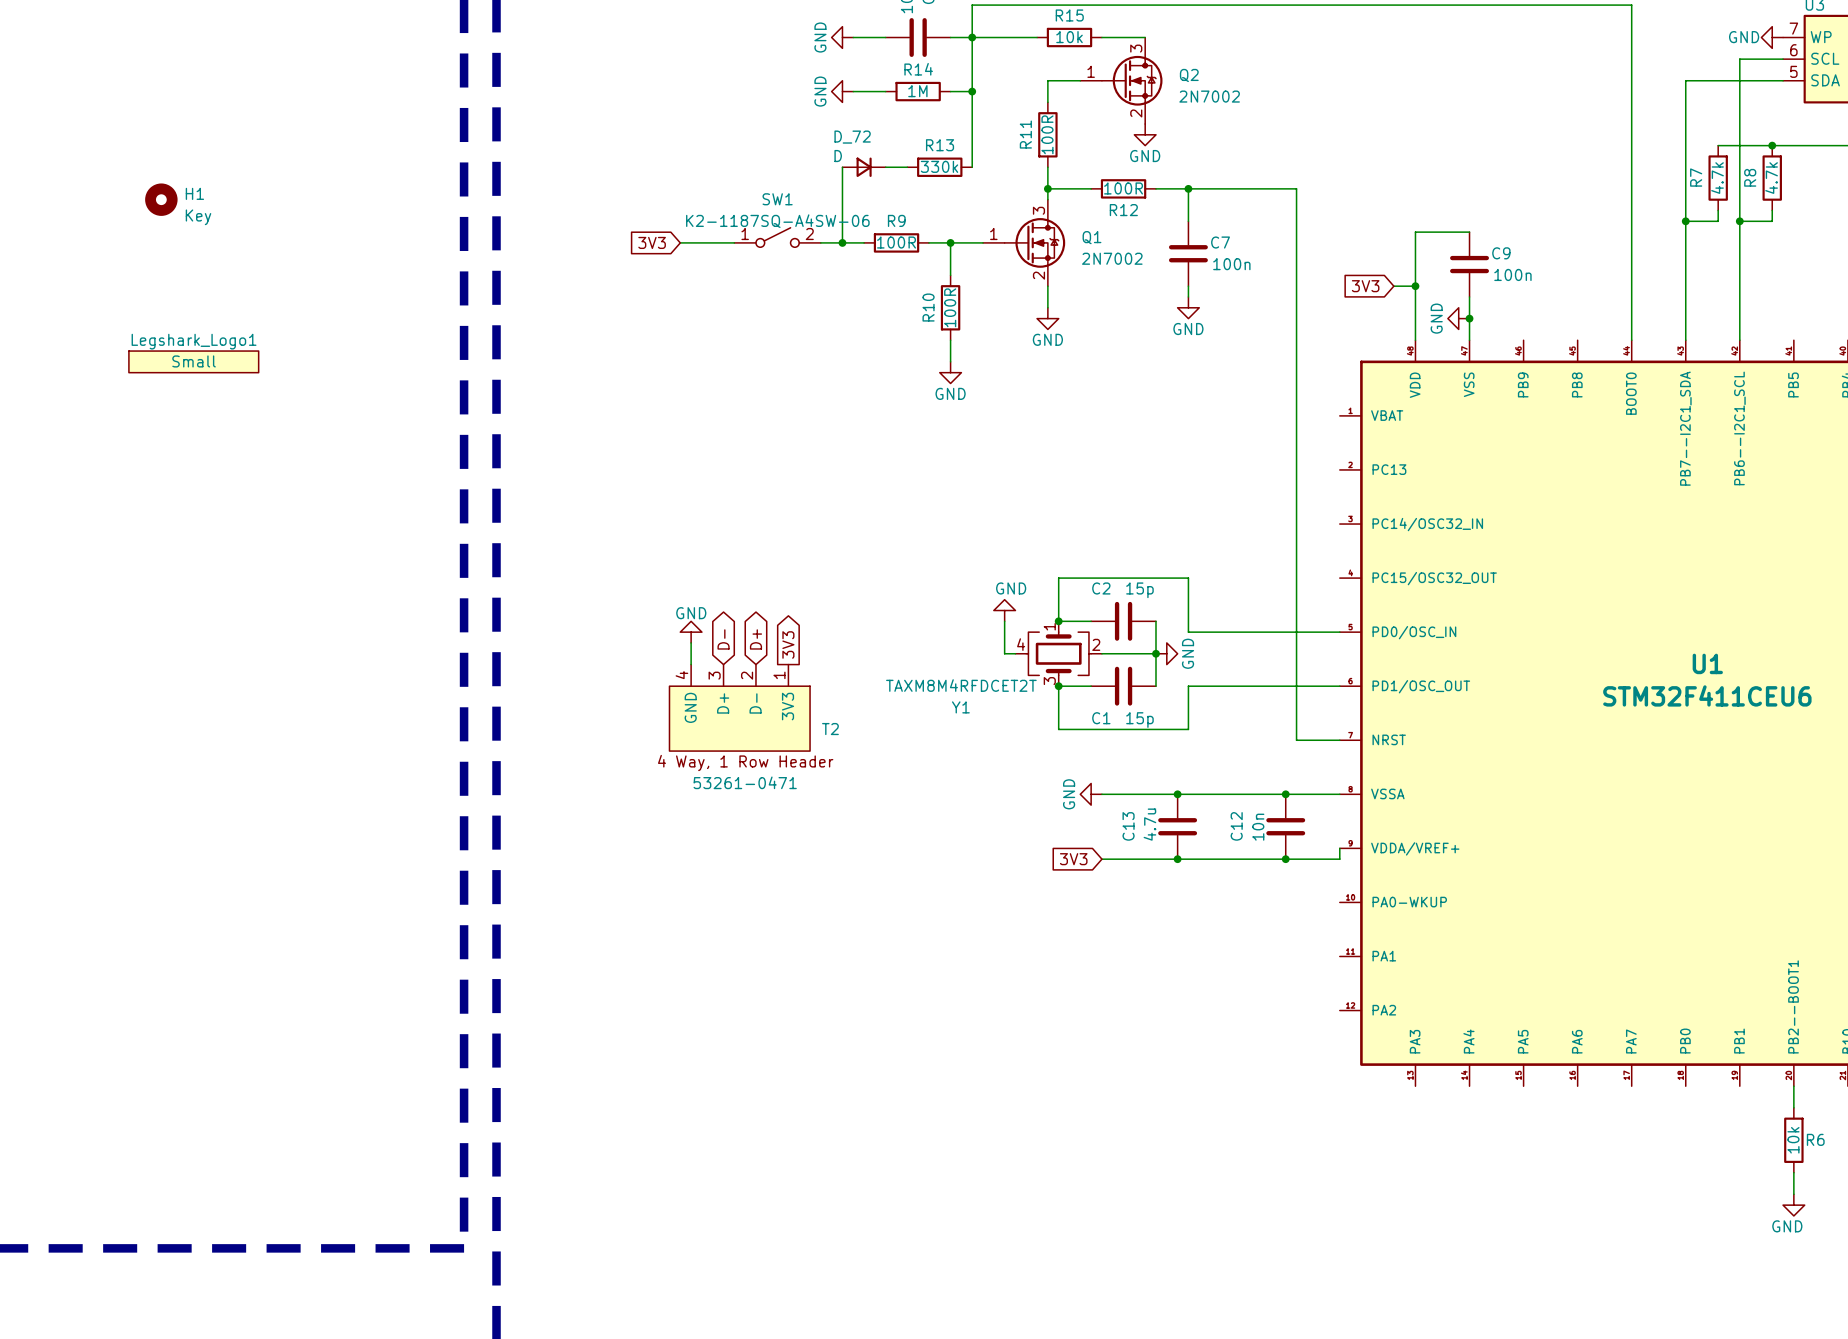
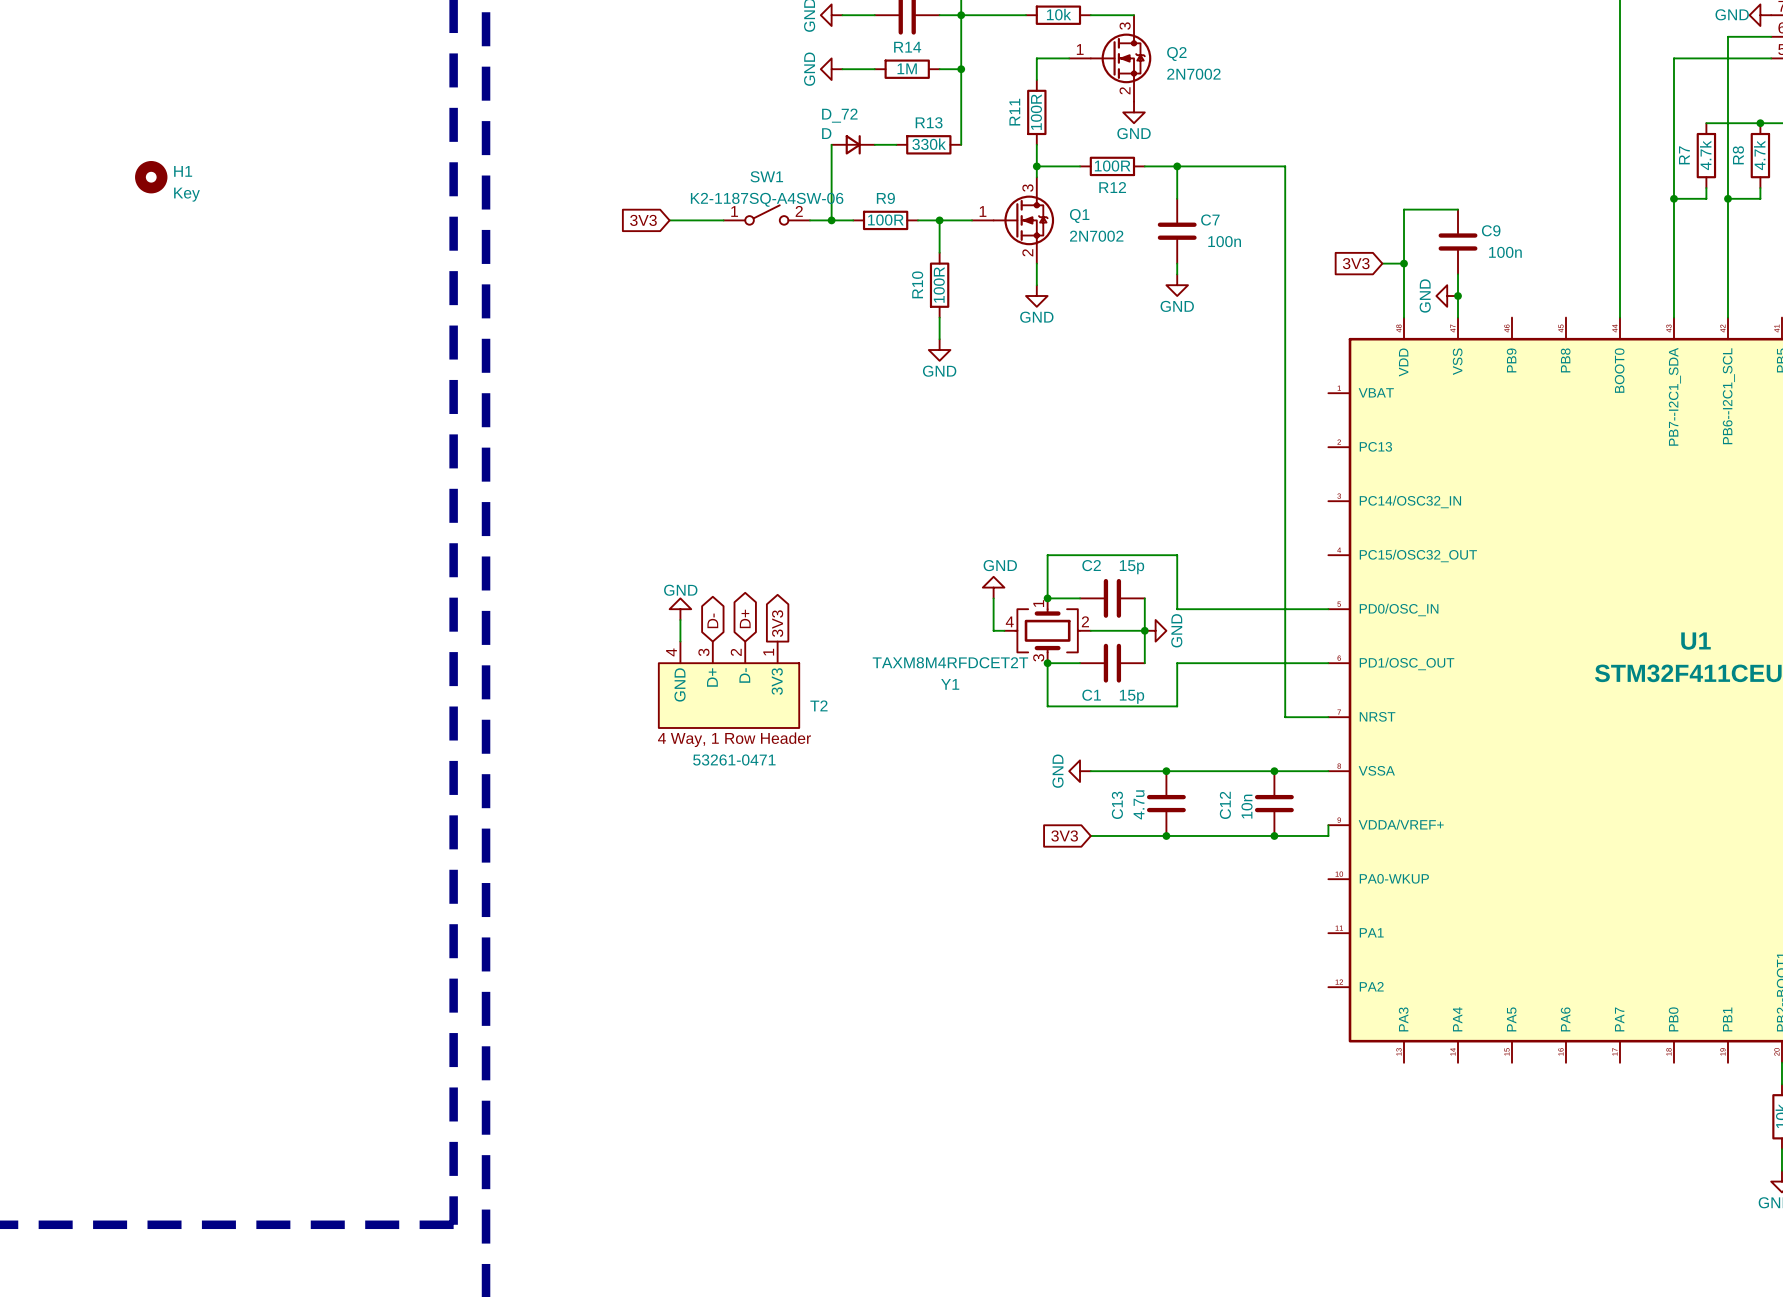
Legshark_Logo1: Small (193, 361) -> none

